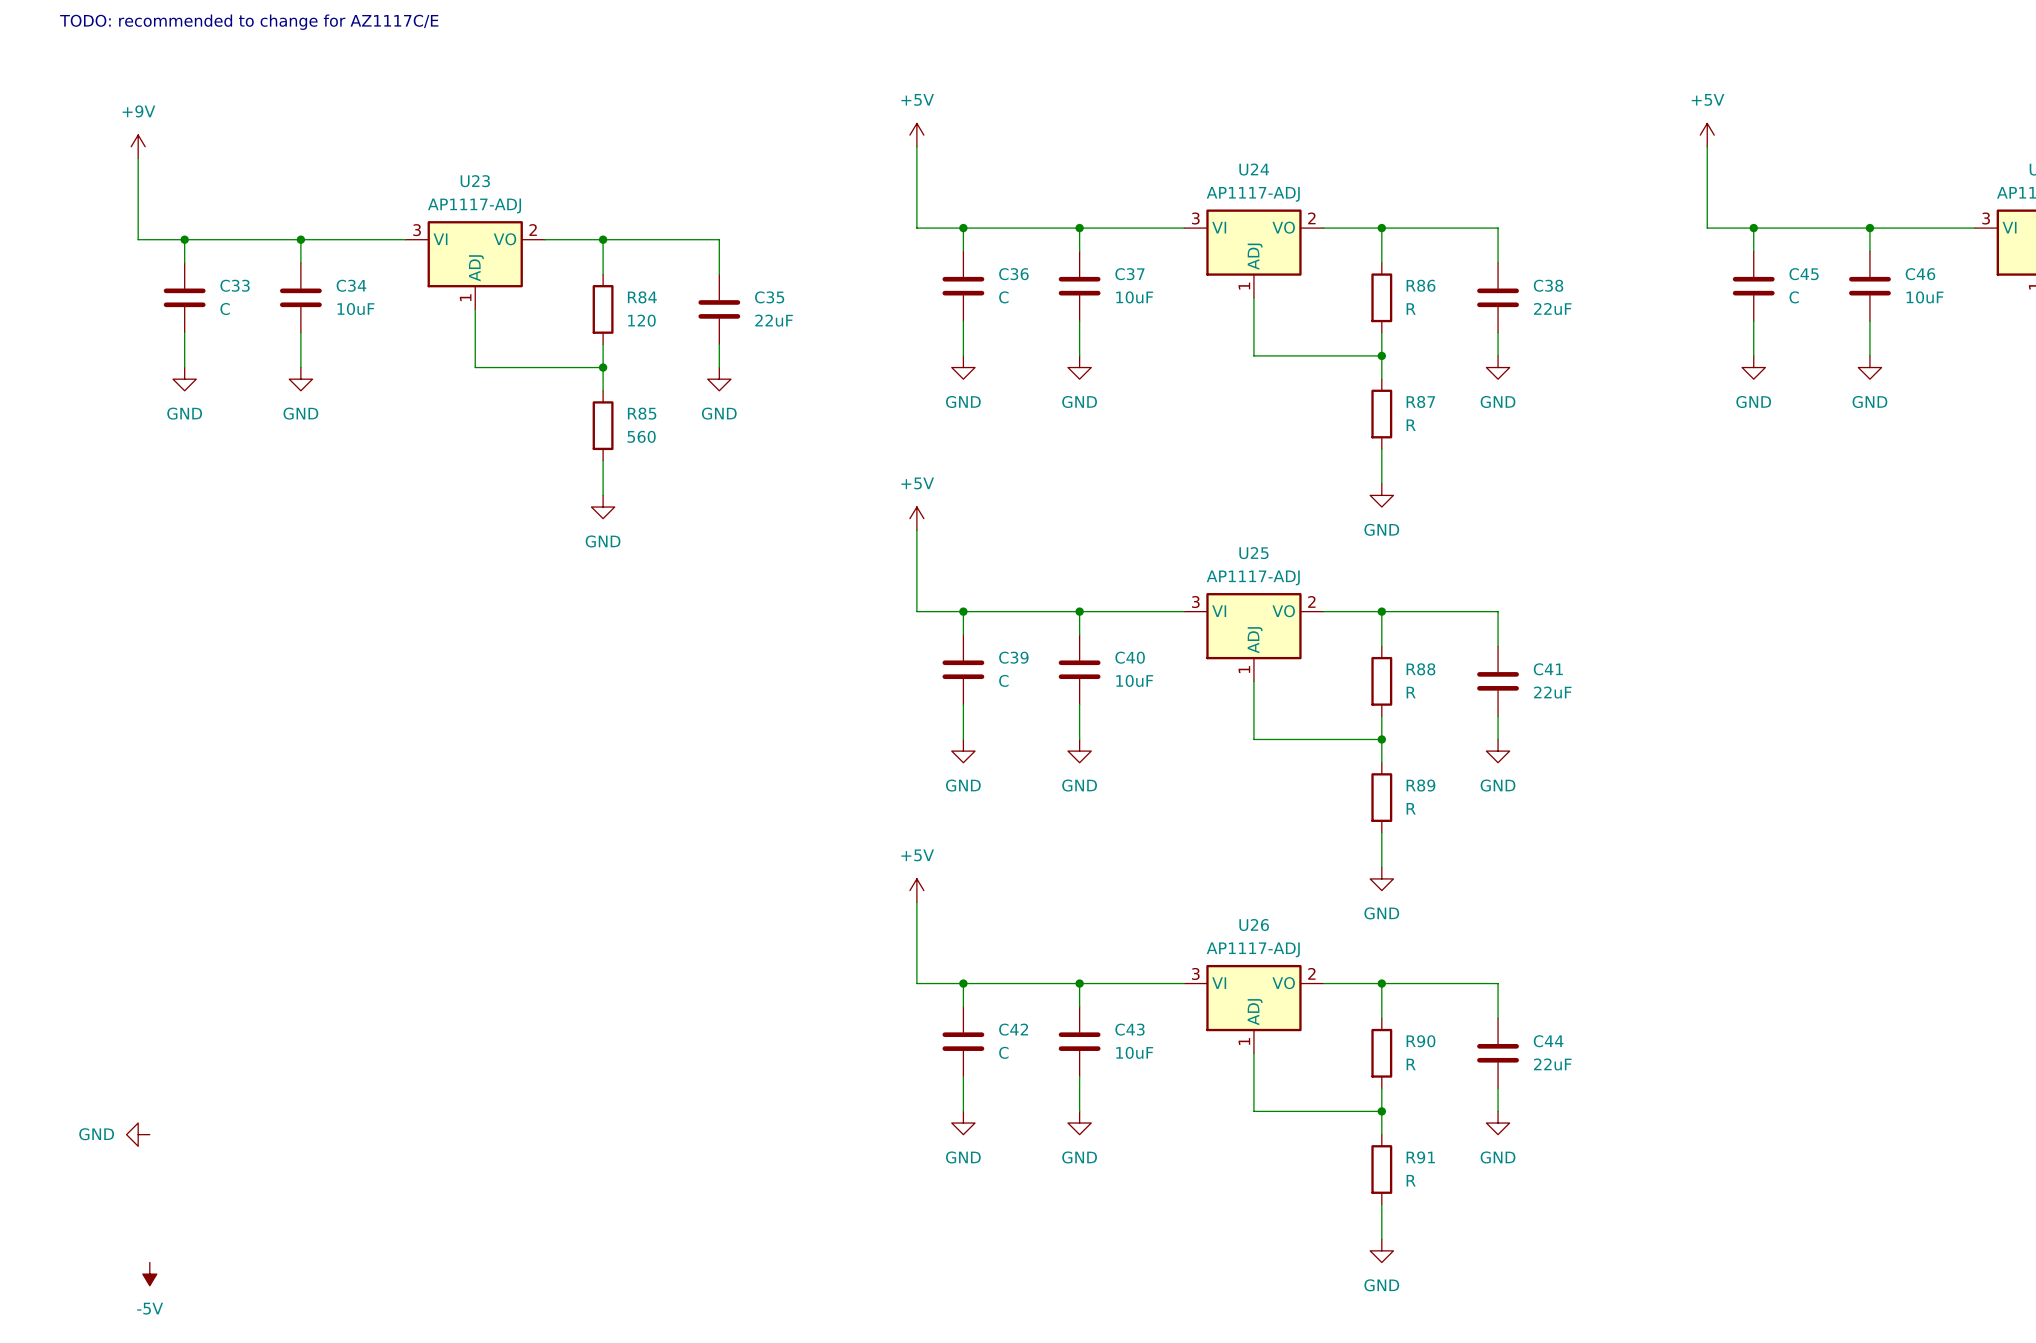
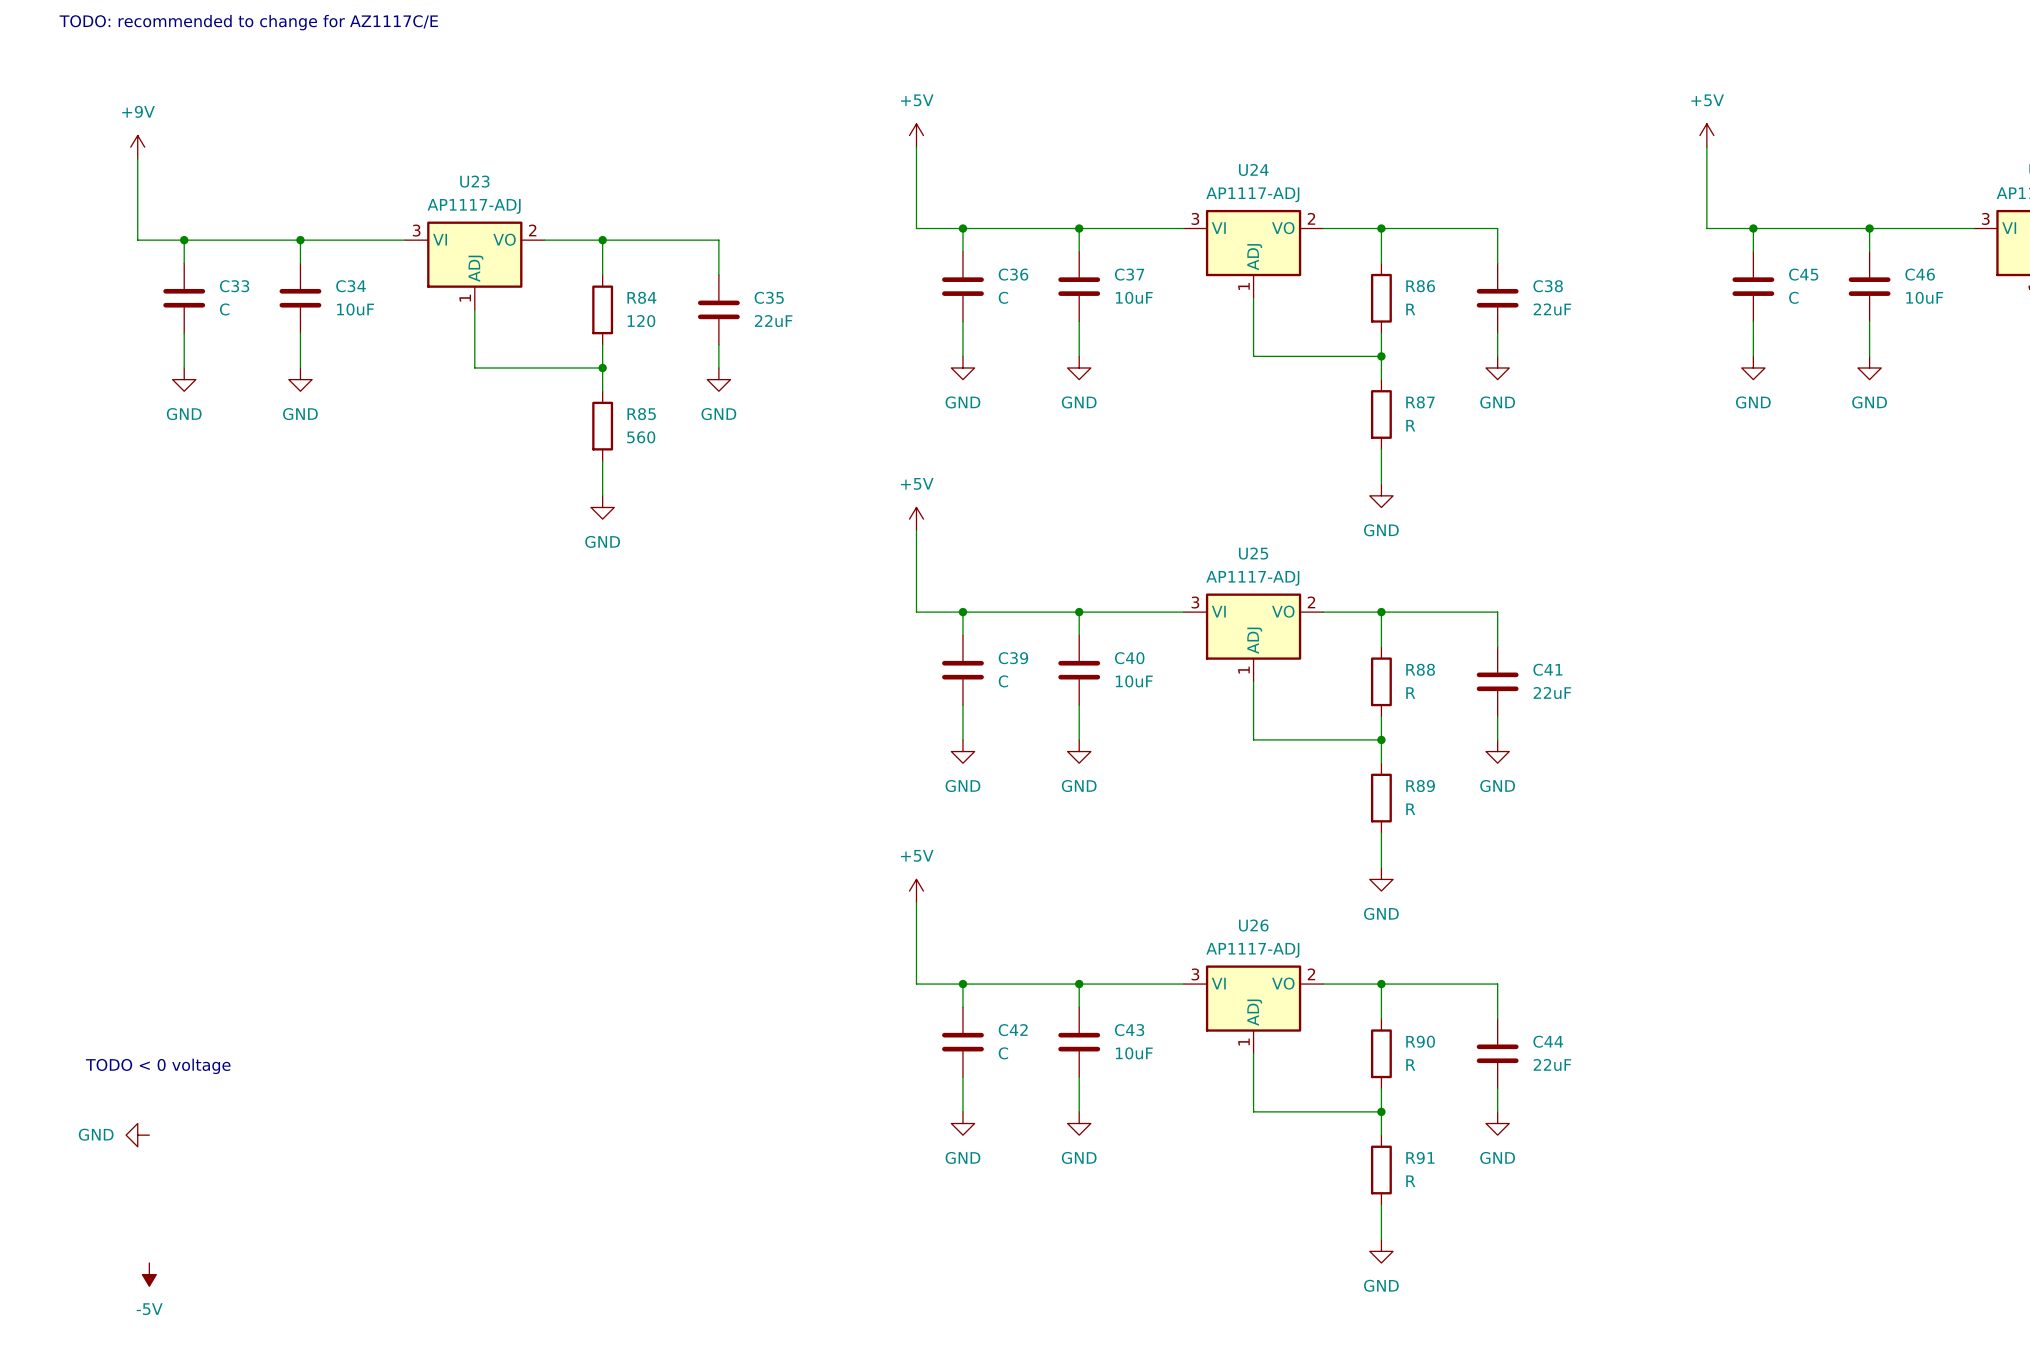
text: none -> TODO < 0 voltage (158, 1066)

